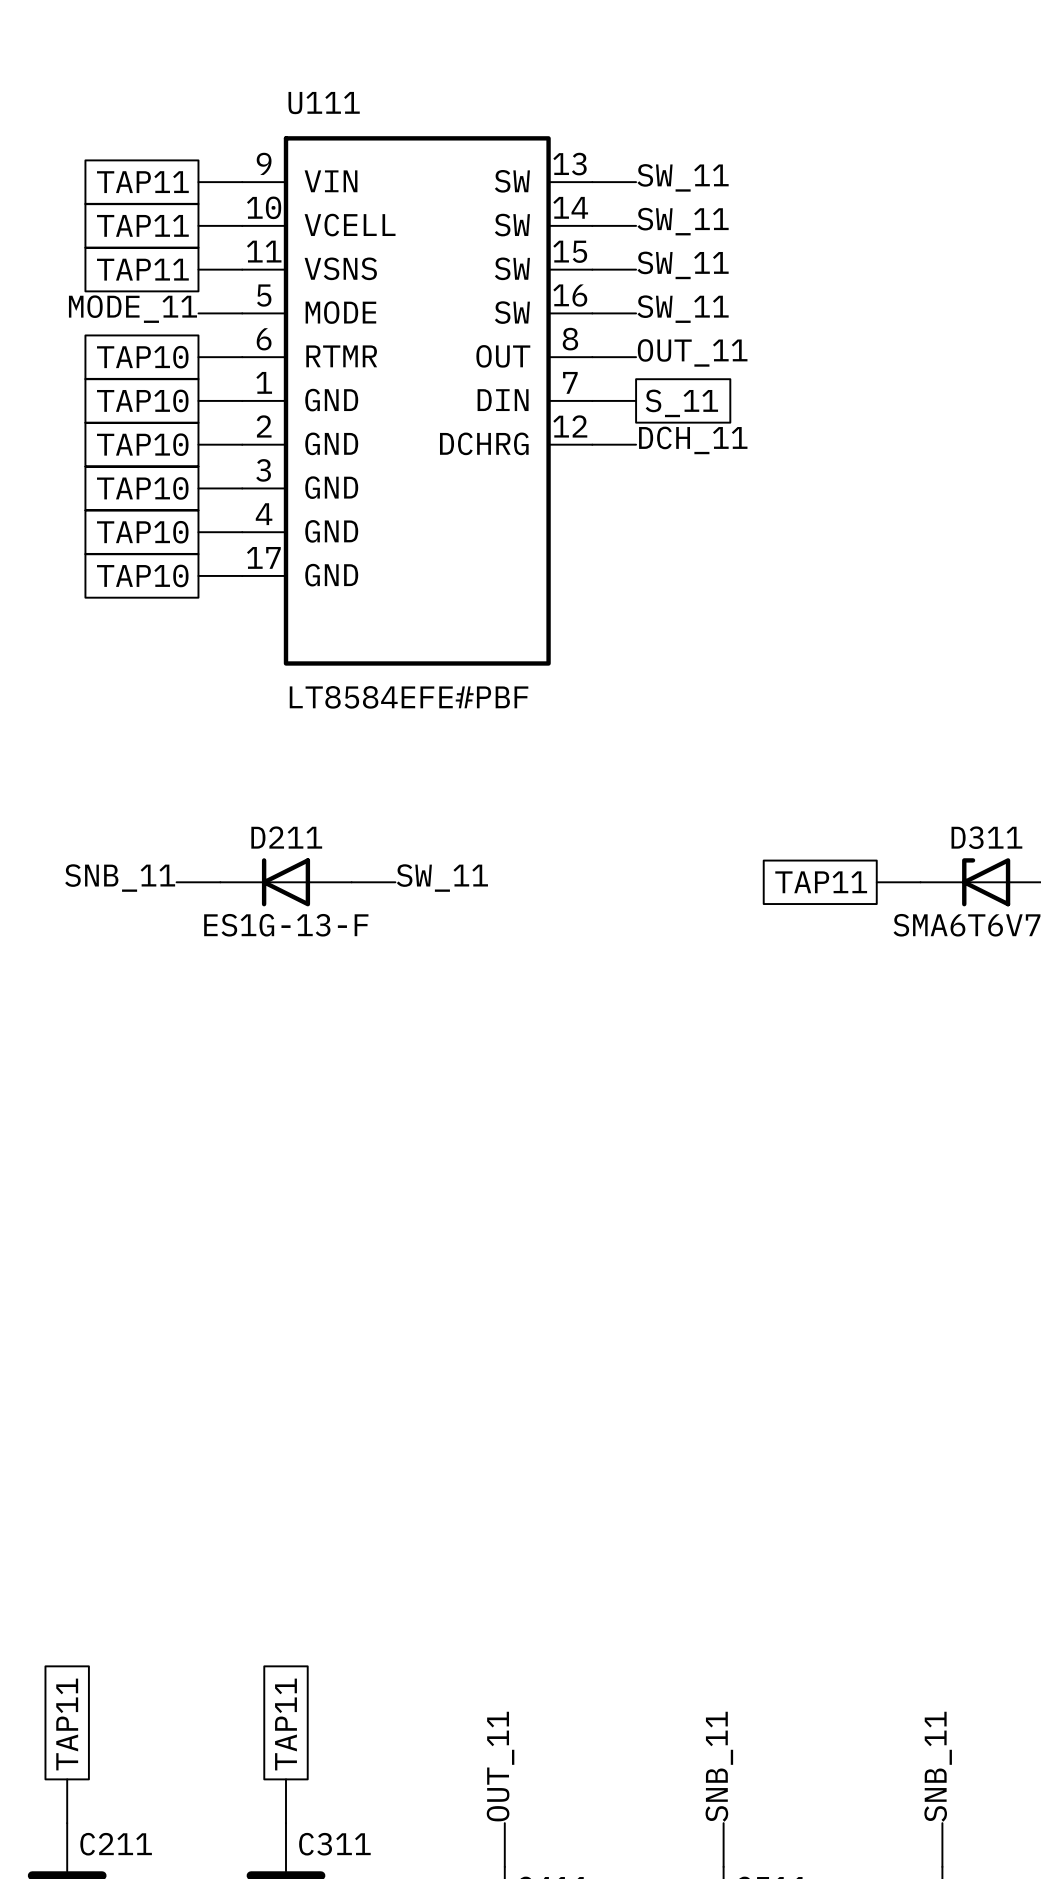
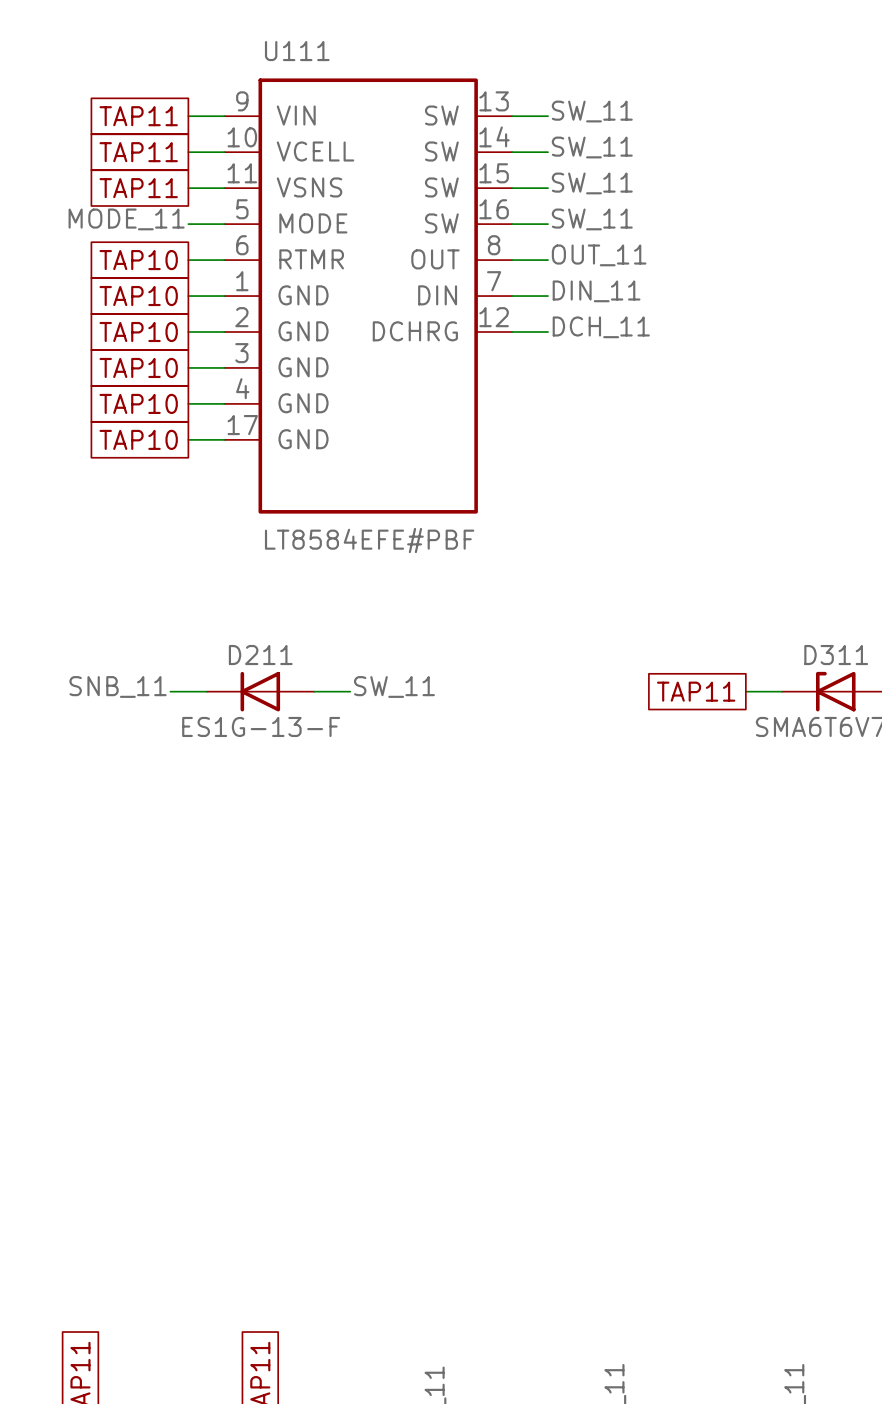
label: none -> DIN_11 (596, 291)
global label: S_11 (681, 403) -> none

